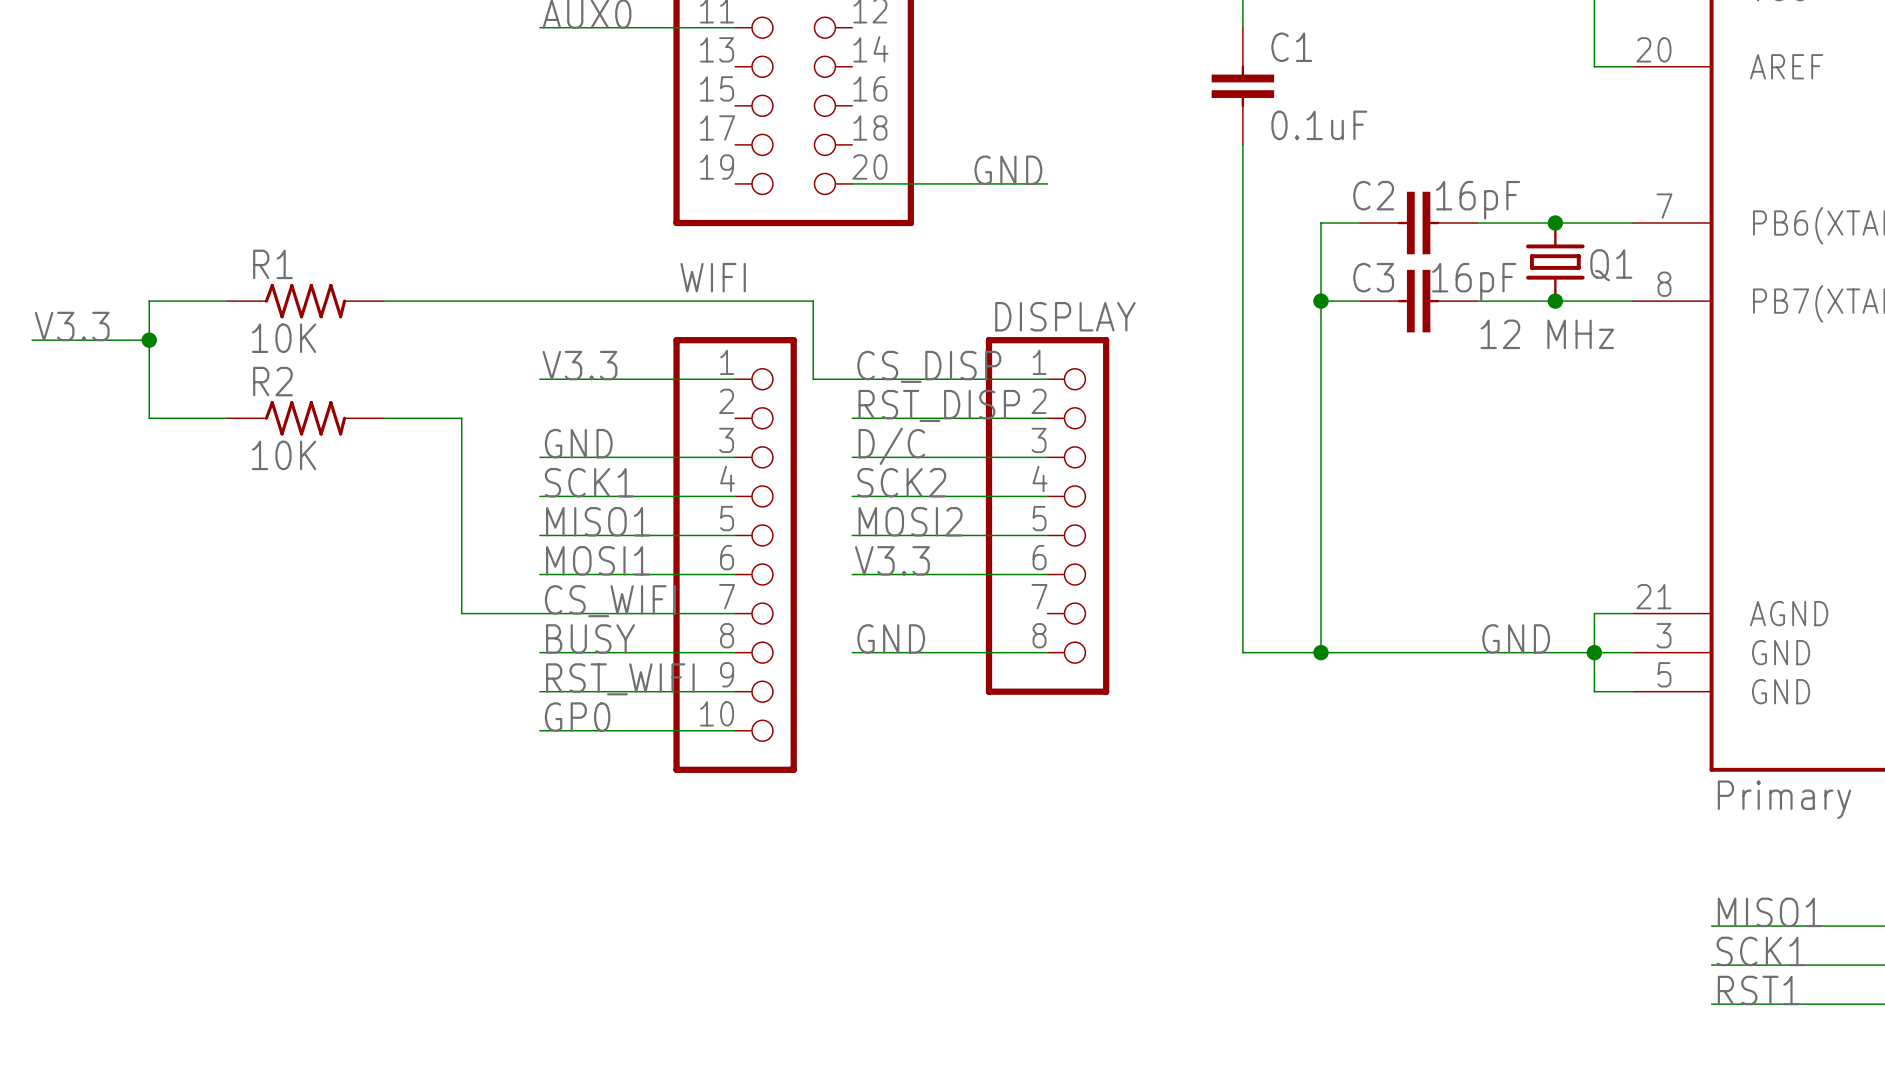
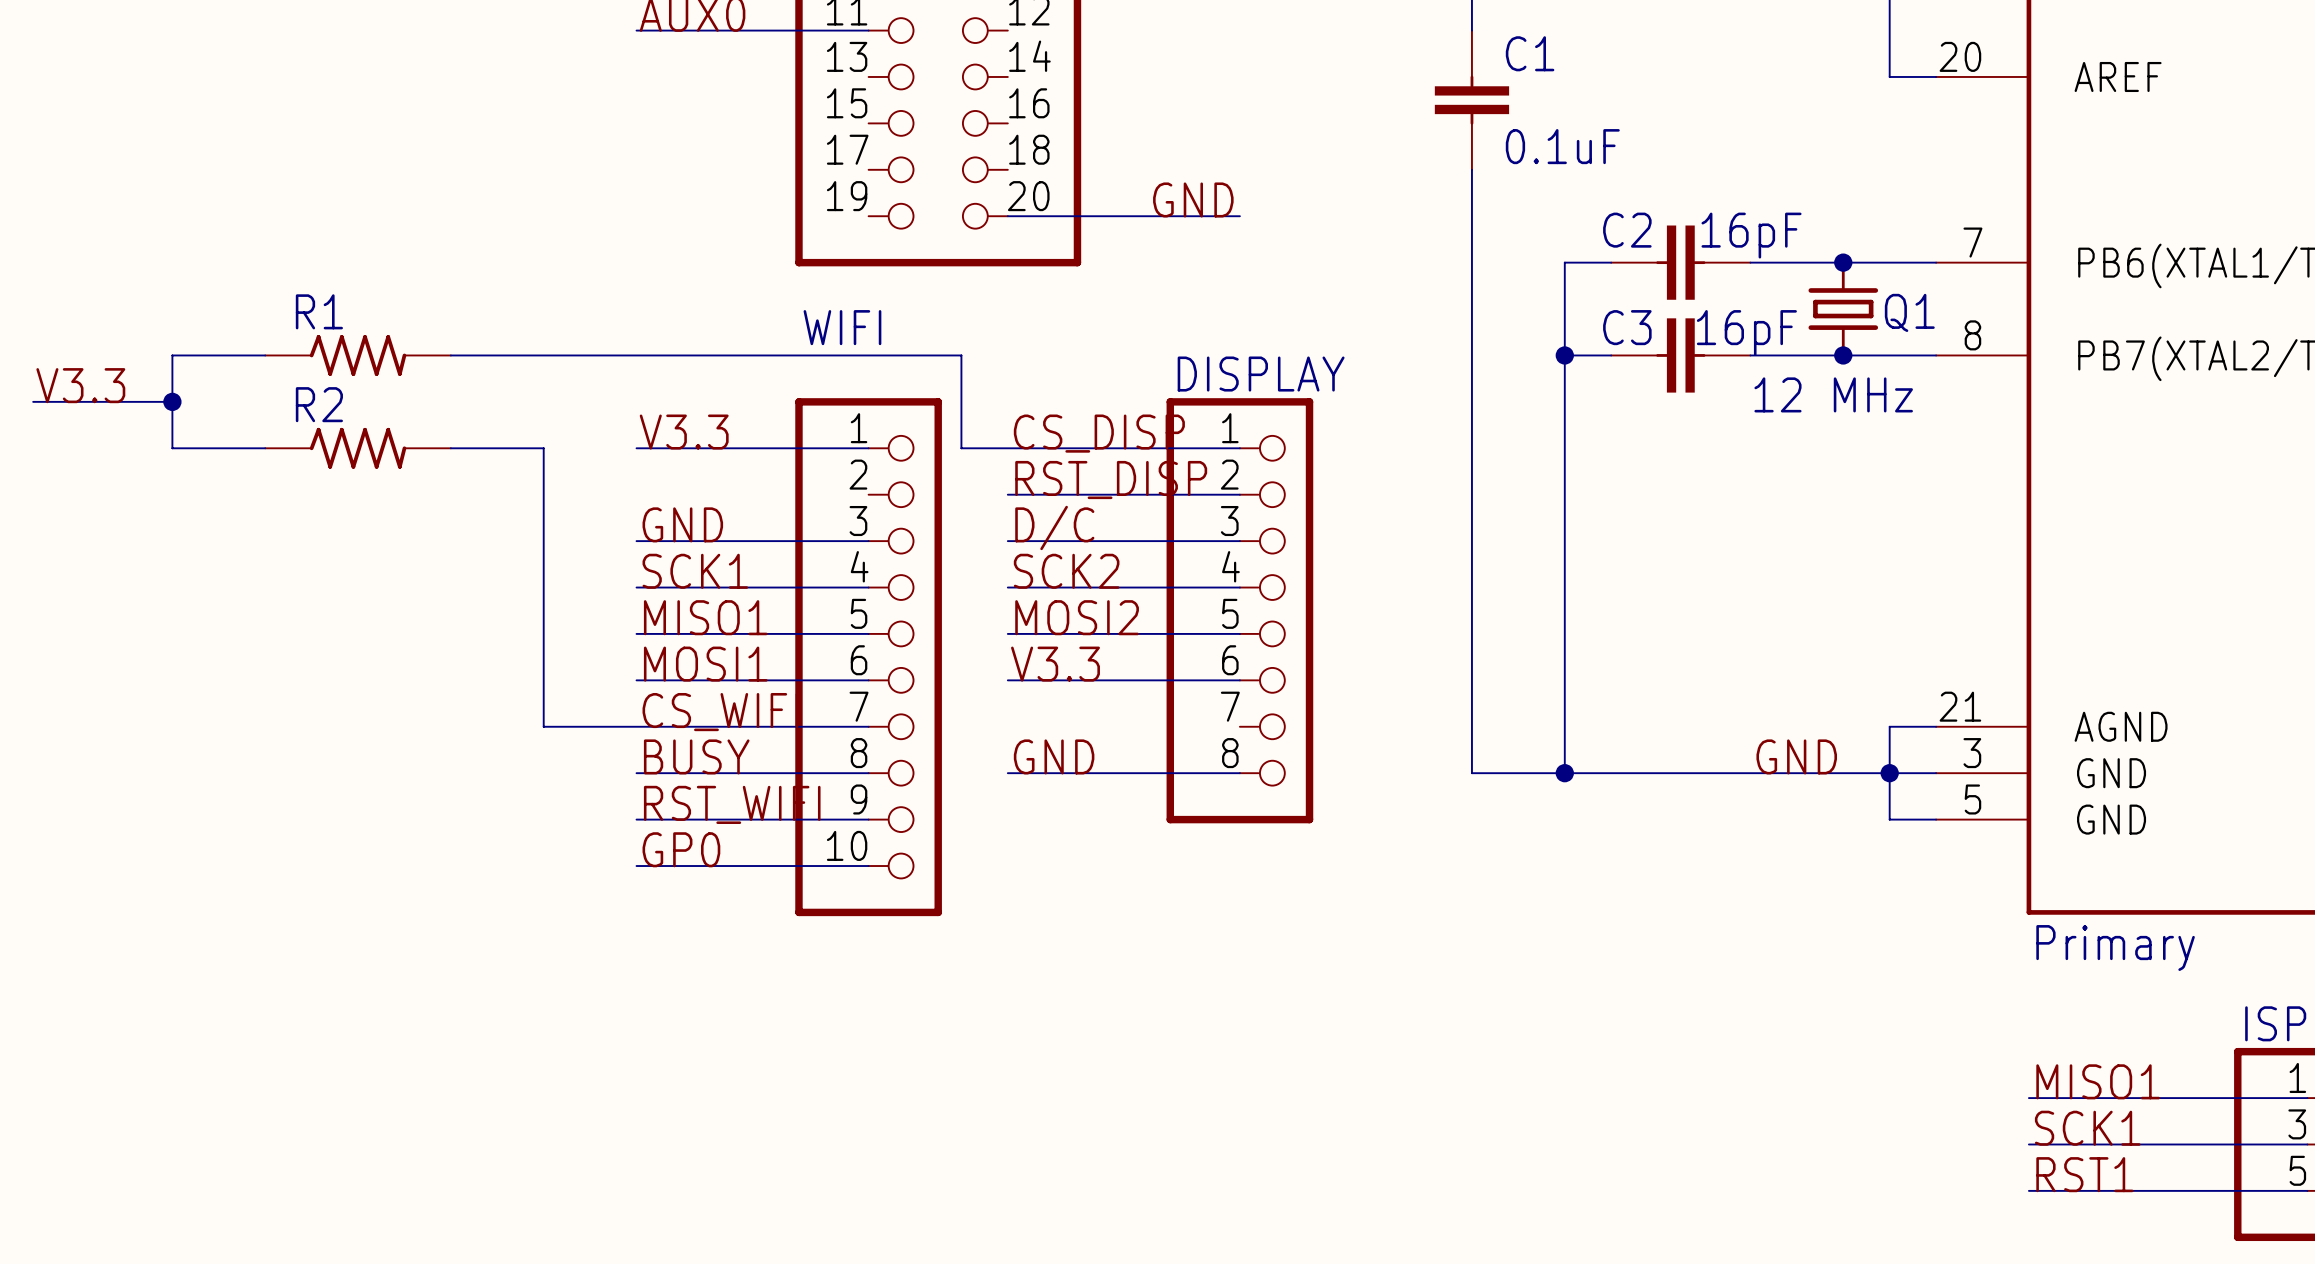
R1 value: 10K (284, 338) -> none
wire: (149, 379) (149, 418) (227, 418) -> (172, 448) (265, 448)
R2 position: (305, 418) -> (358, 448)
wire: (383, 418) (461, 418) -> (450, 448) (543, 448) (543, 494)
R2 value: 10K (284, 455) -> none

